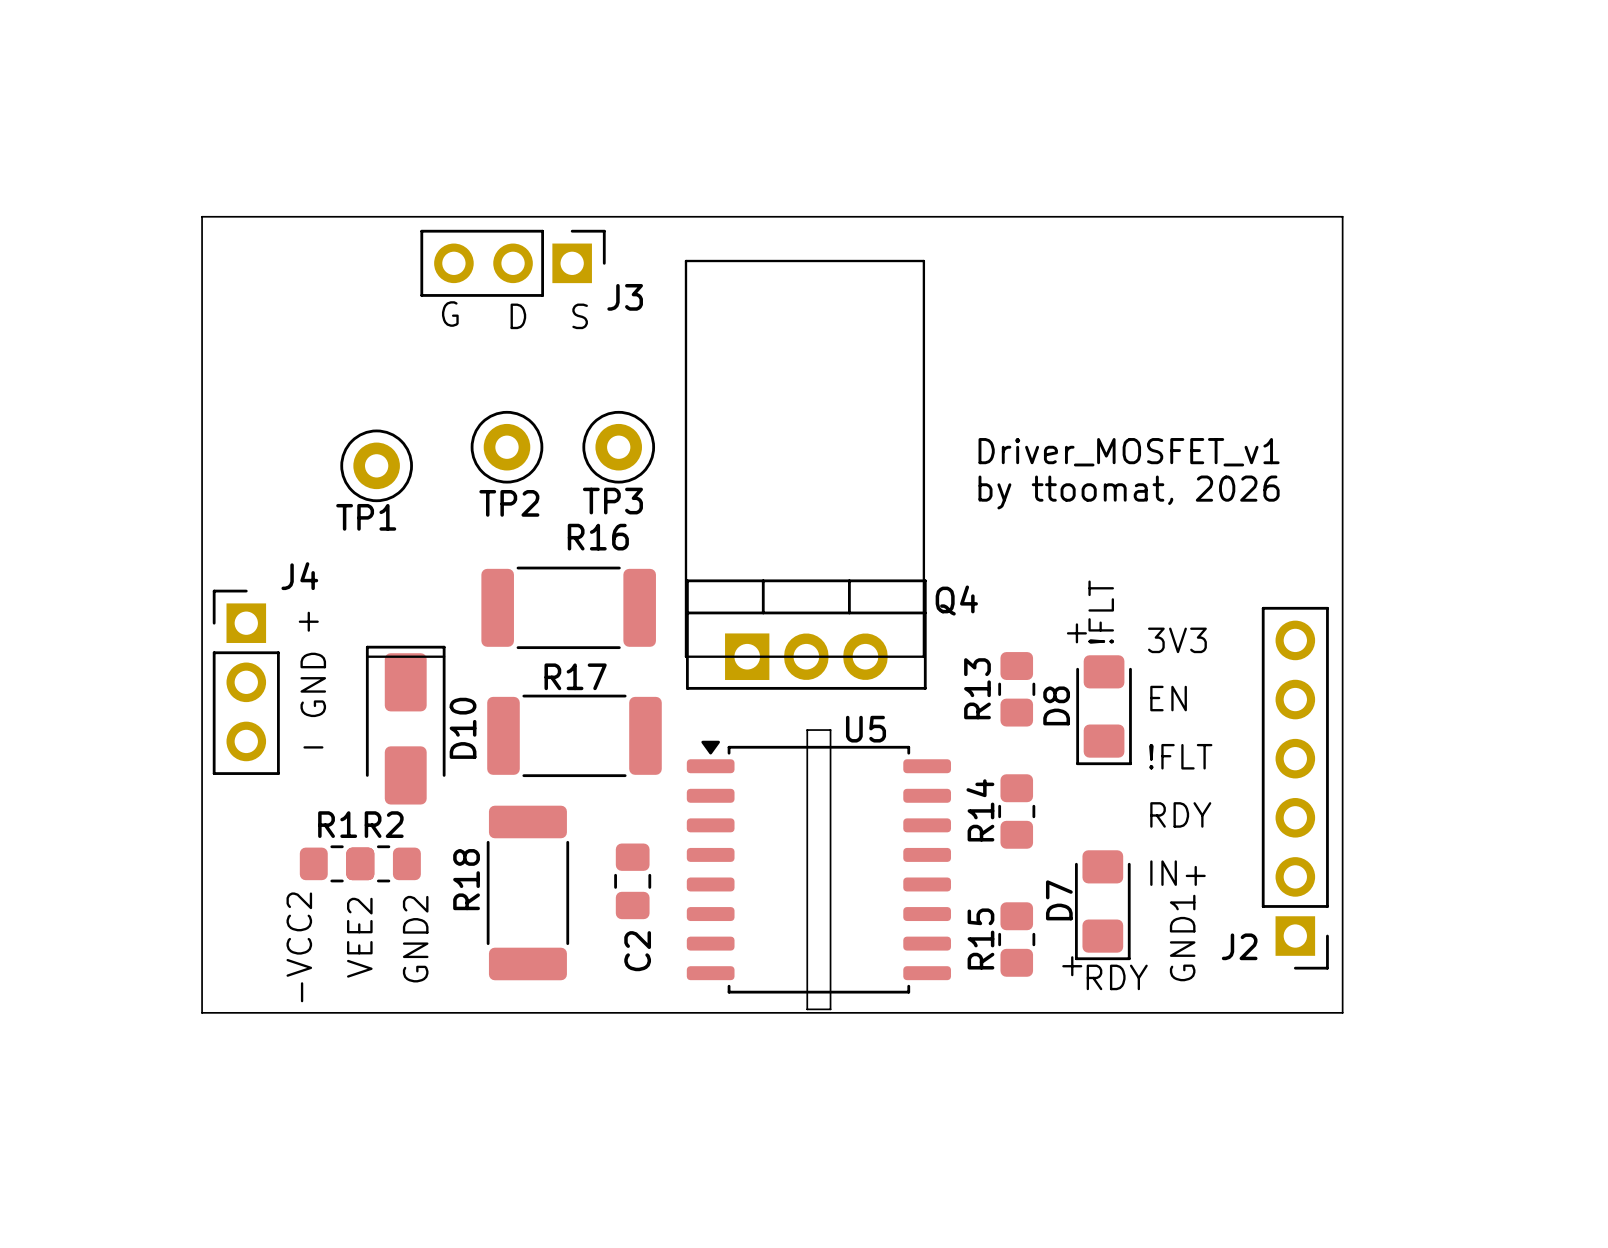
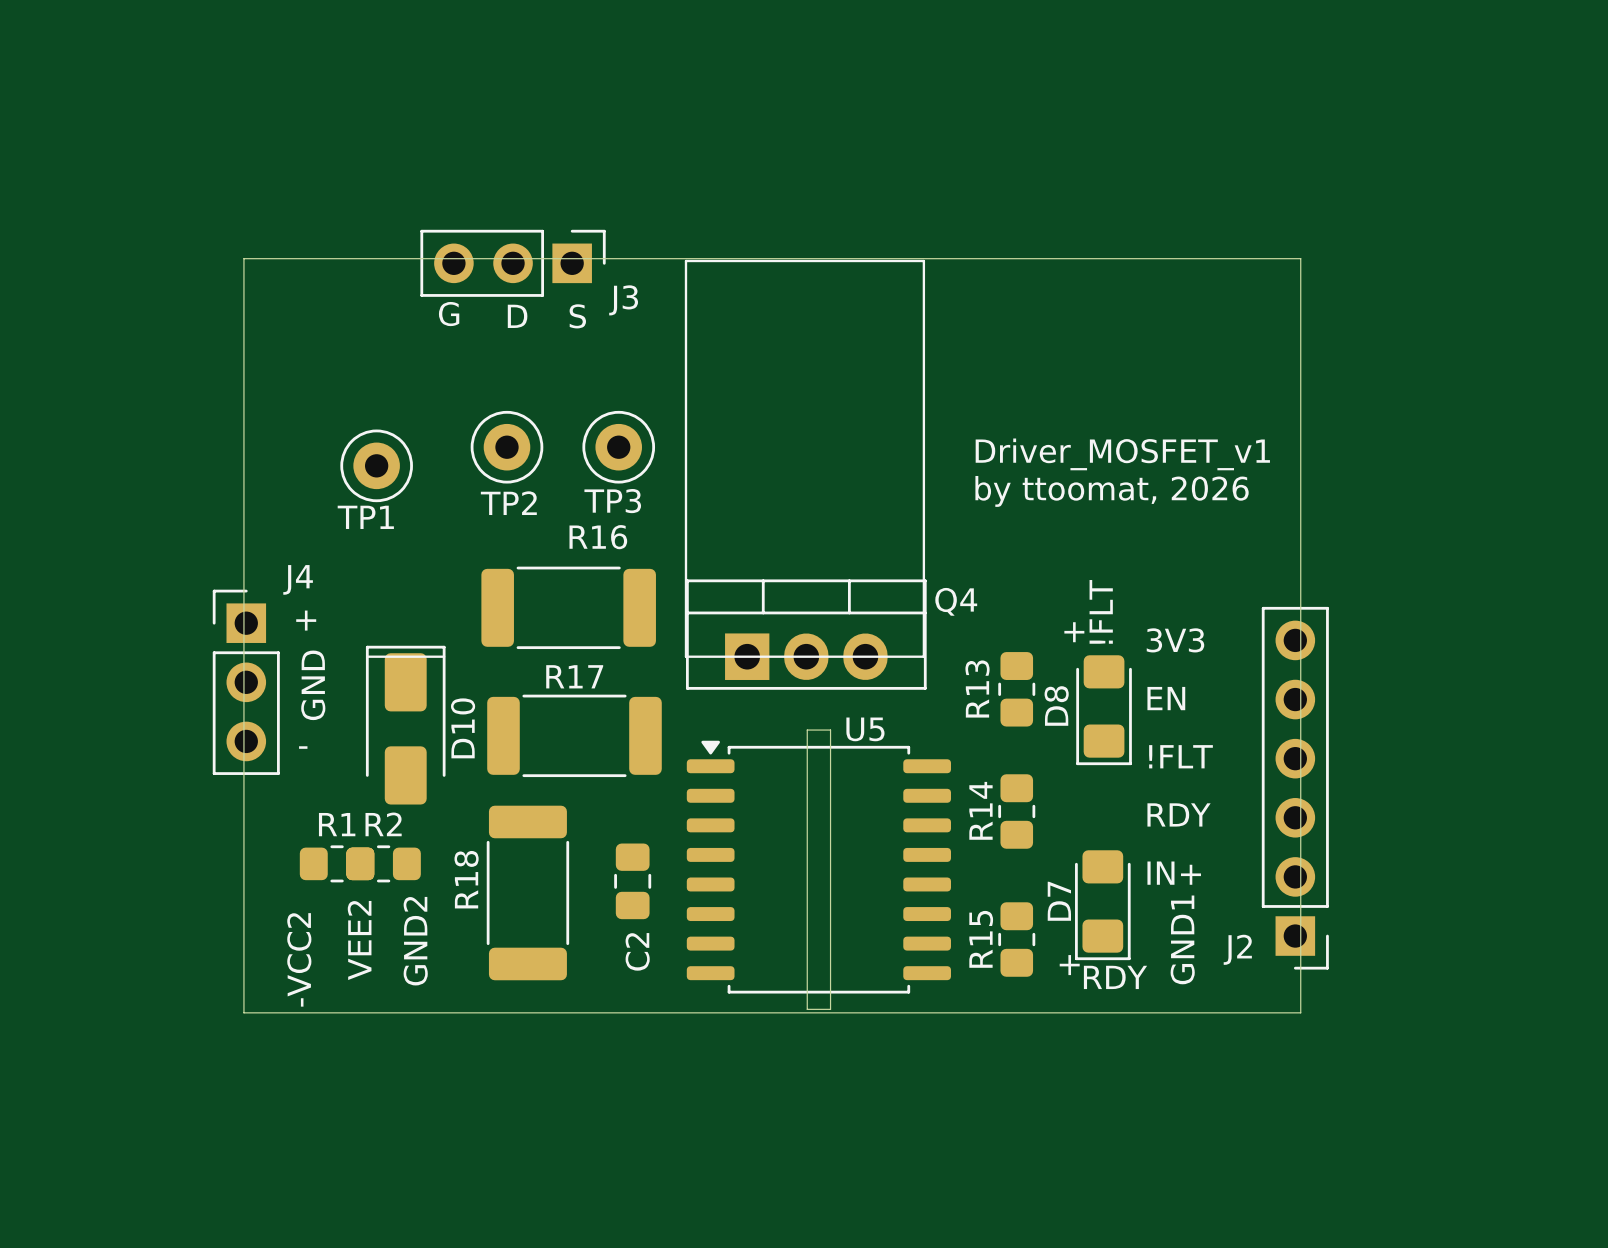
board edge: (243, 1012) (202, 1012) (202, 216) (1342, 216) (1342, 1012) (1300, 1012) -> (243, 1012) (243, 258) (1300, 258) (1300, 1012)

